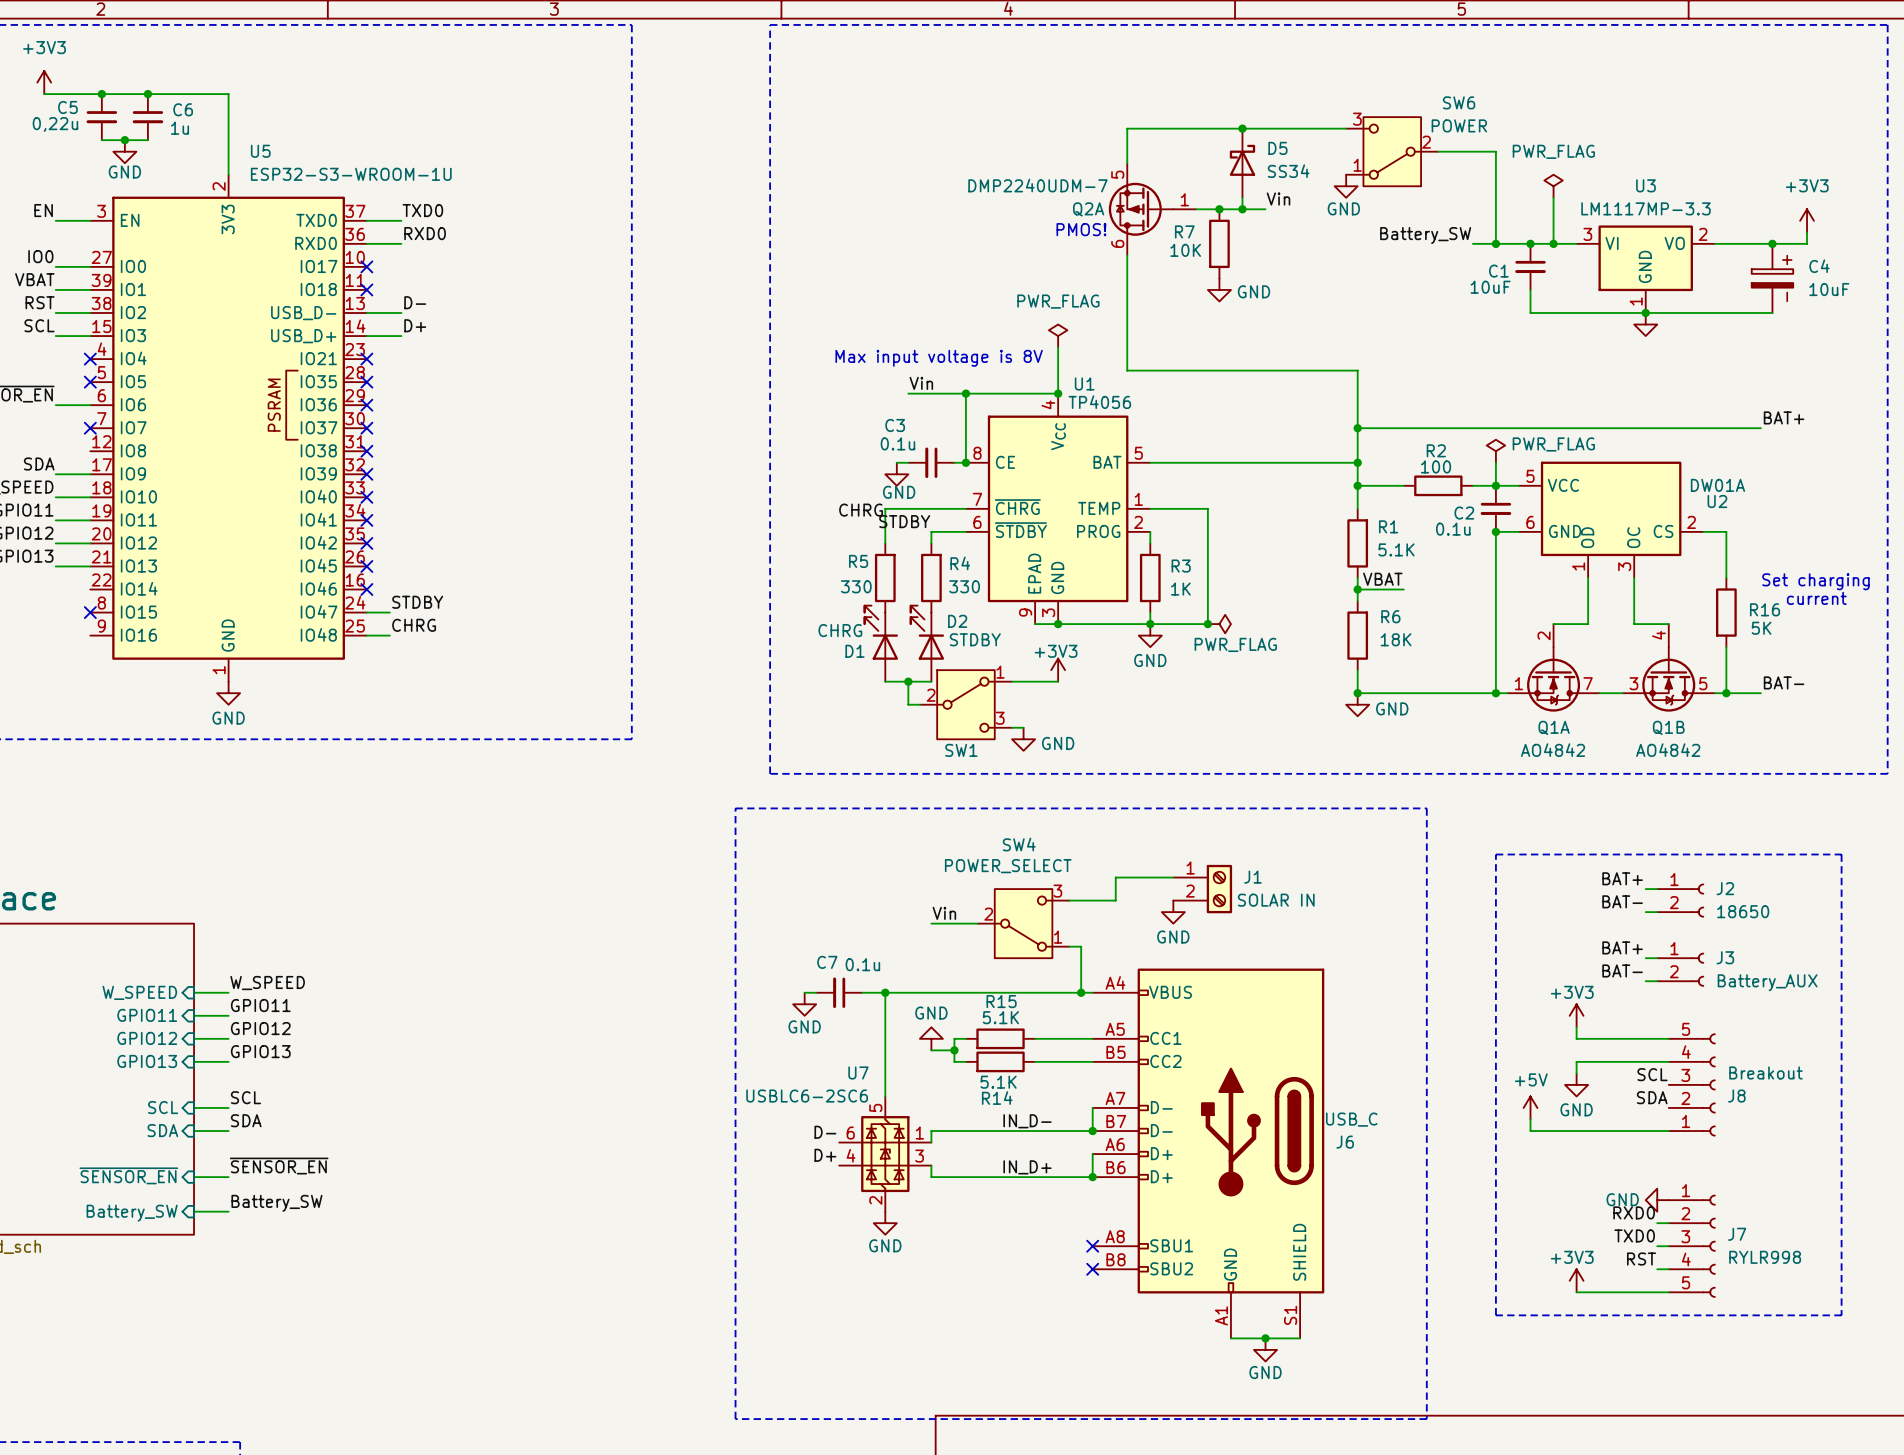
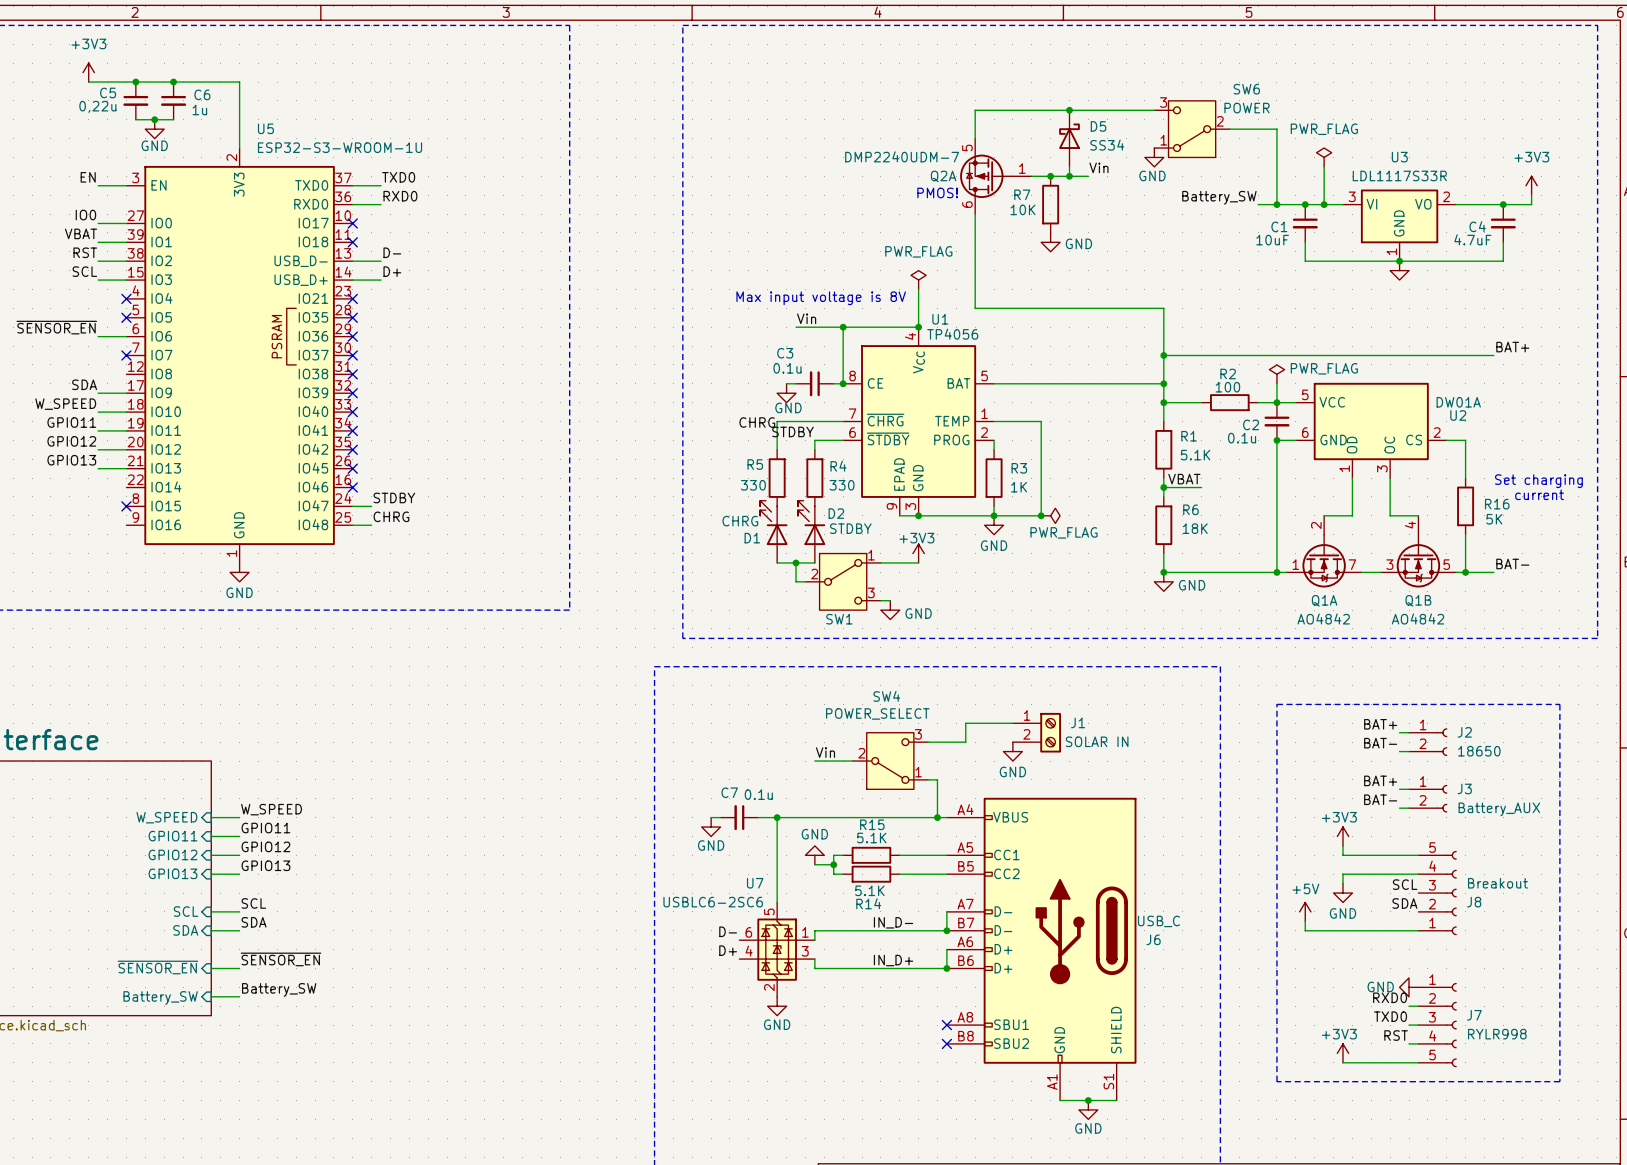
U3 value: LM1117MP-3.3 (1645, 208) -> LDL1117S33R (1399, 175)
C4 symbol: [1751, 243, 1794, 313] -> [1490, 204, 1516, 243]
C4 name position: C4 (1819, 266) -> C4 (1477, 226)
C4 value: 10uF (1829, 289) -> 4.7uF (1472, 239)

